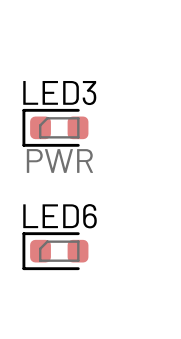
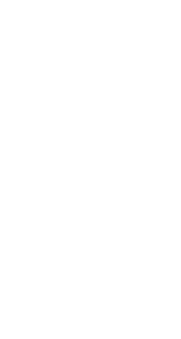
LED3: PWR (55, 127) -> none
LED6: (55, 251) -> none

